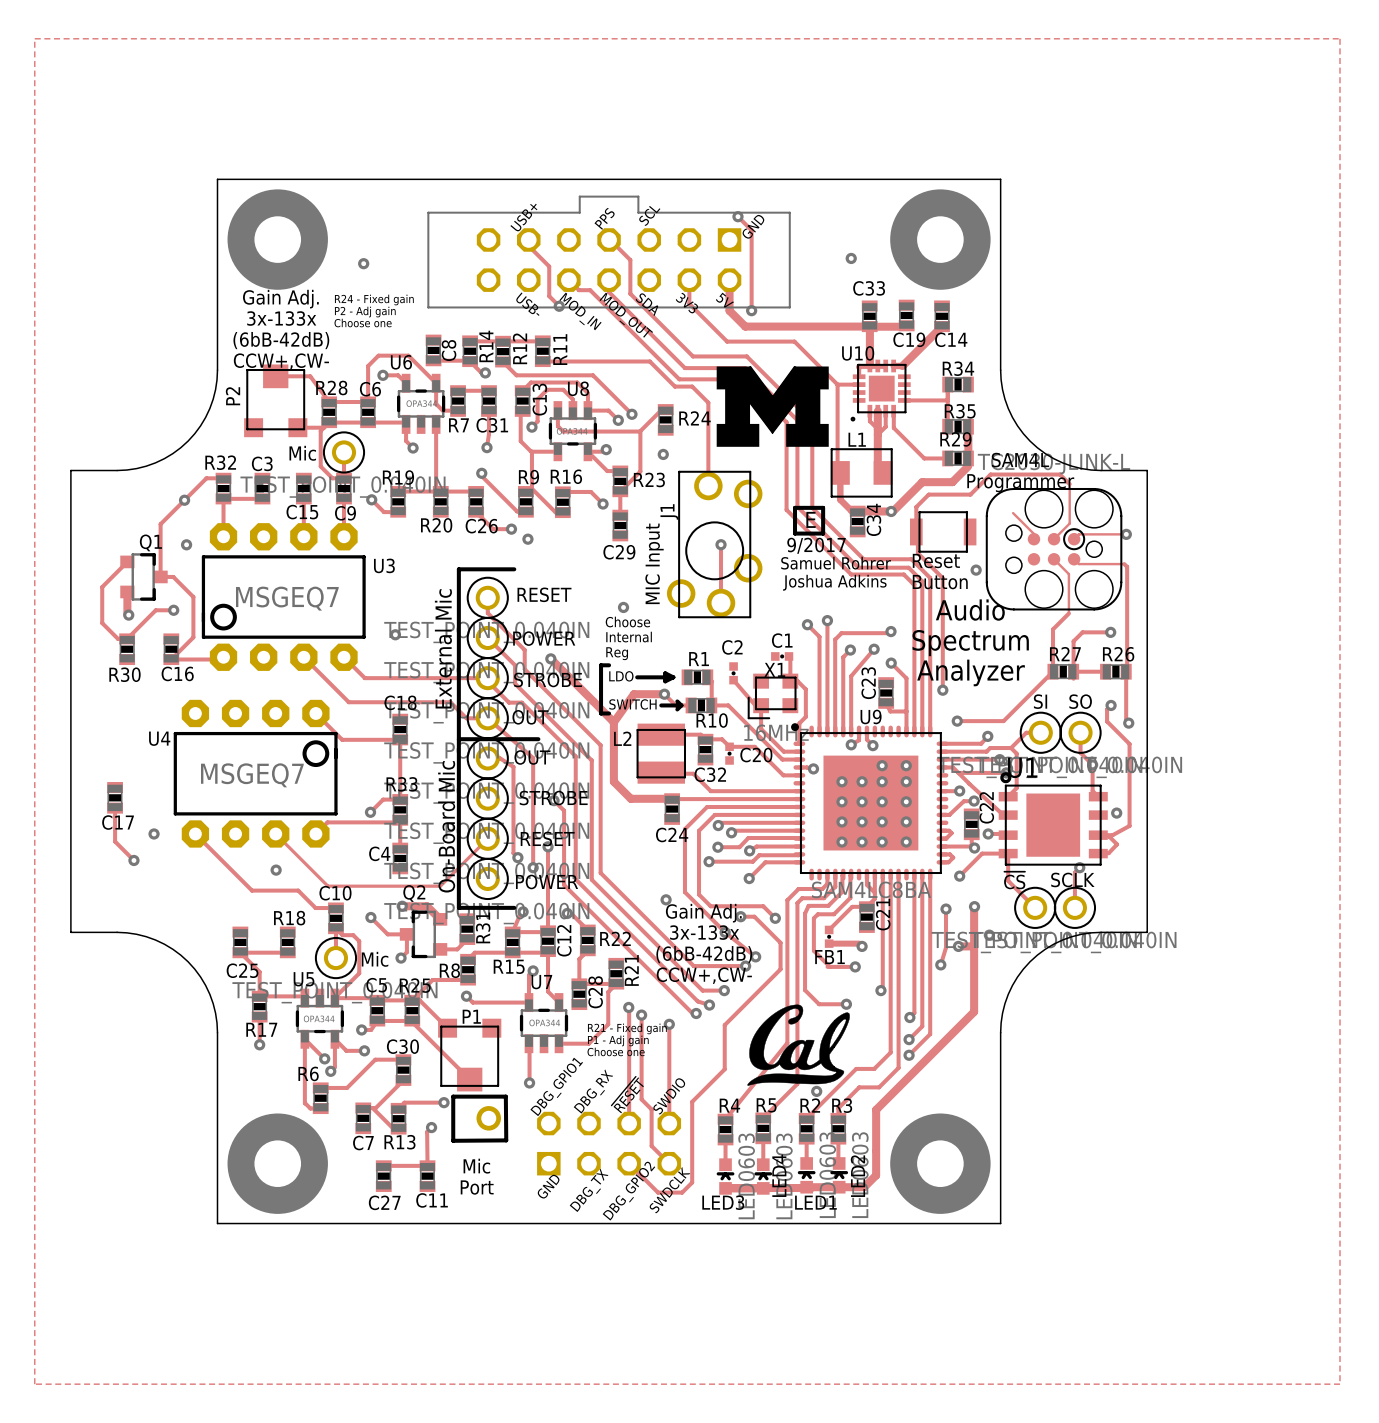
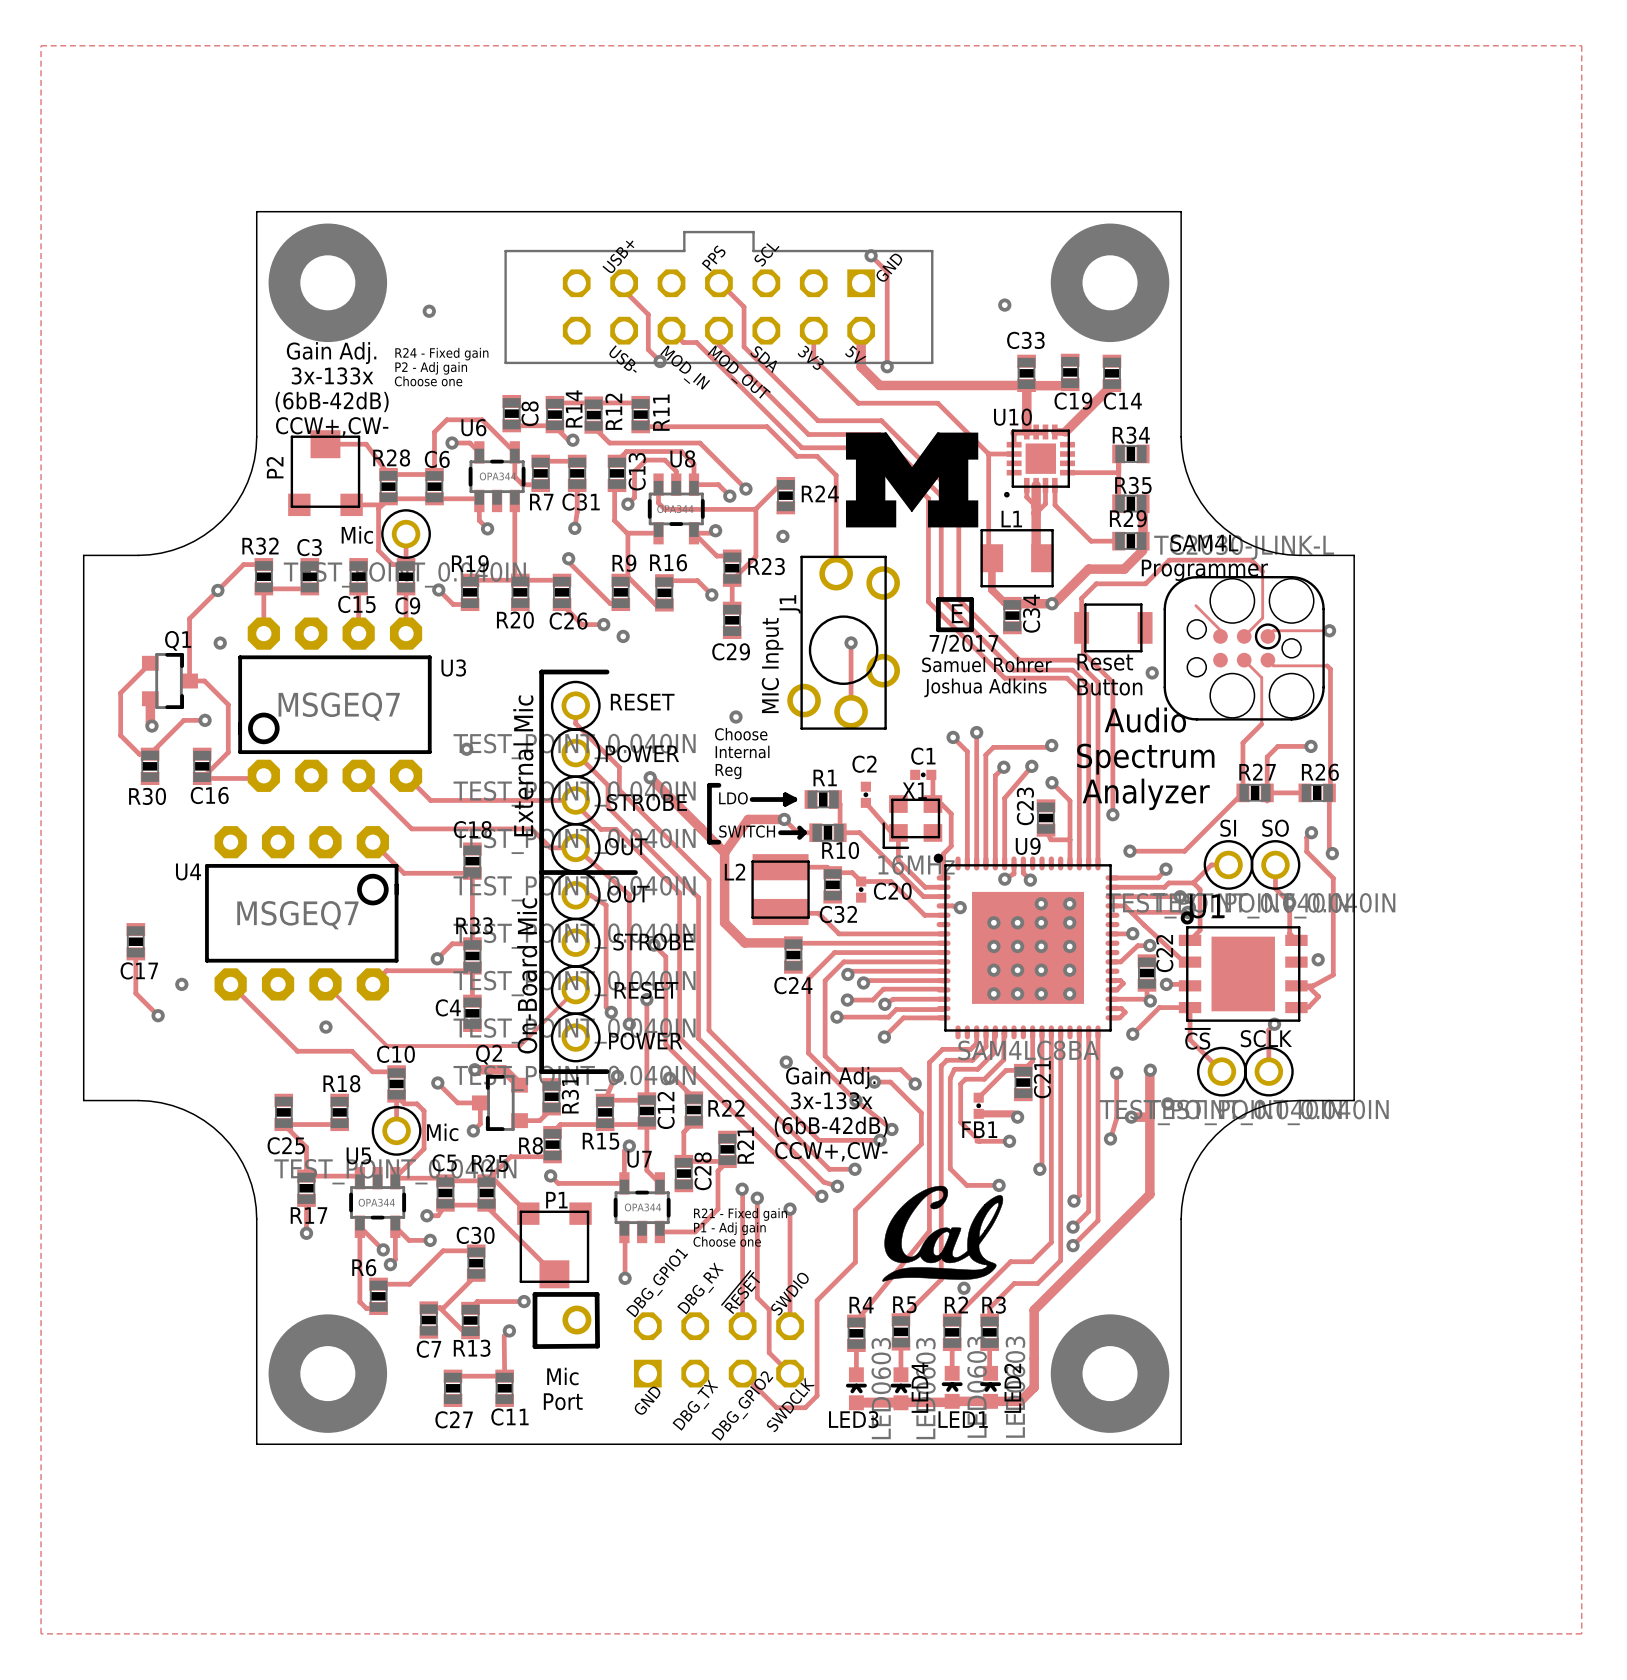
text: 9/2017 (816, 545) -> 7/2017 (963, 644)
track: (866, 874) (866, 884) (874, 892) -> none

